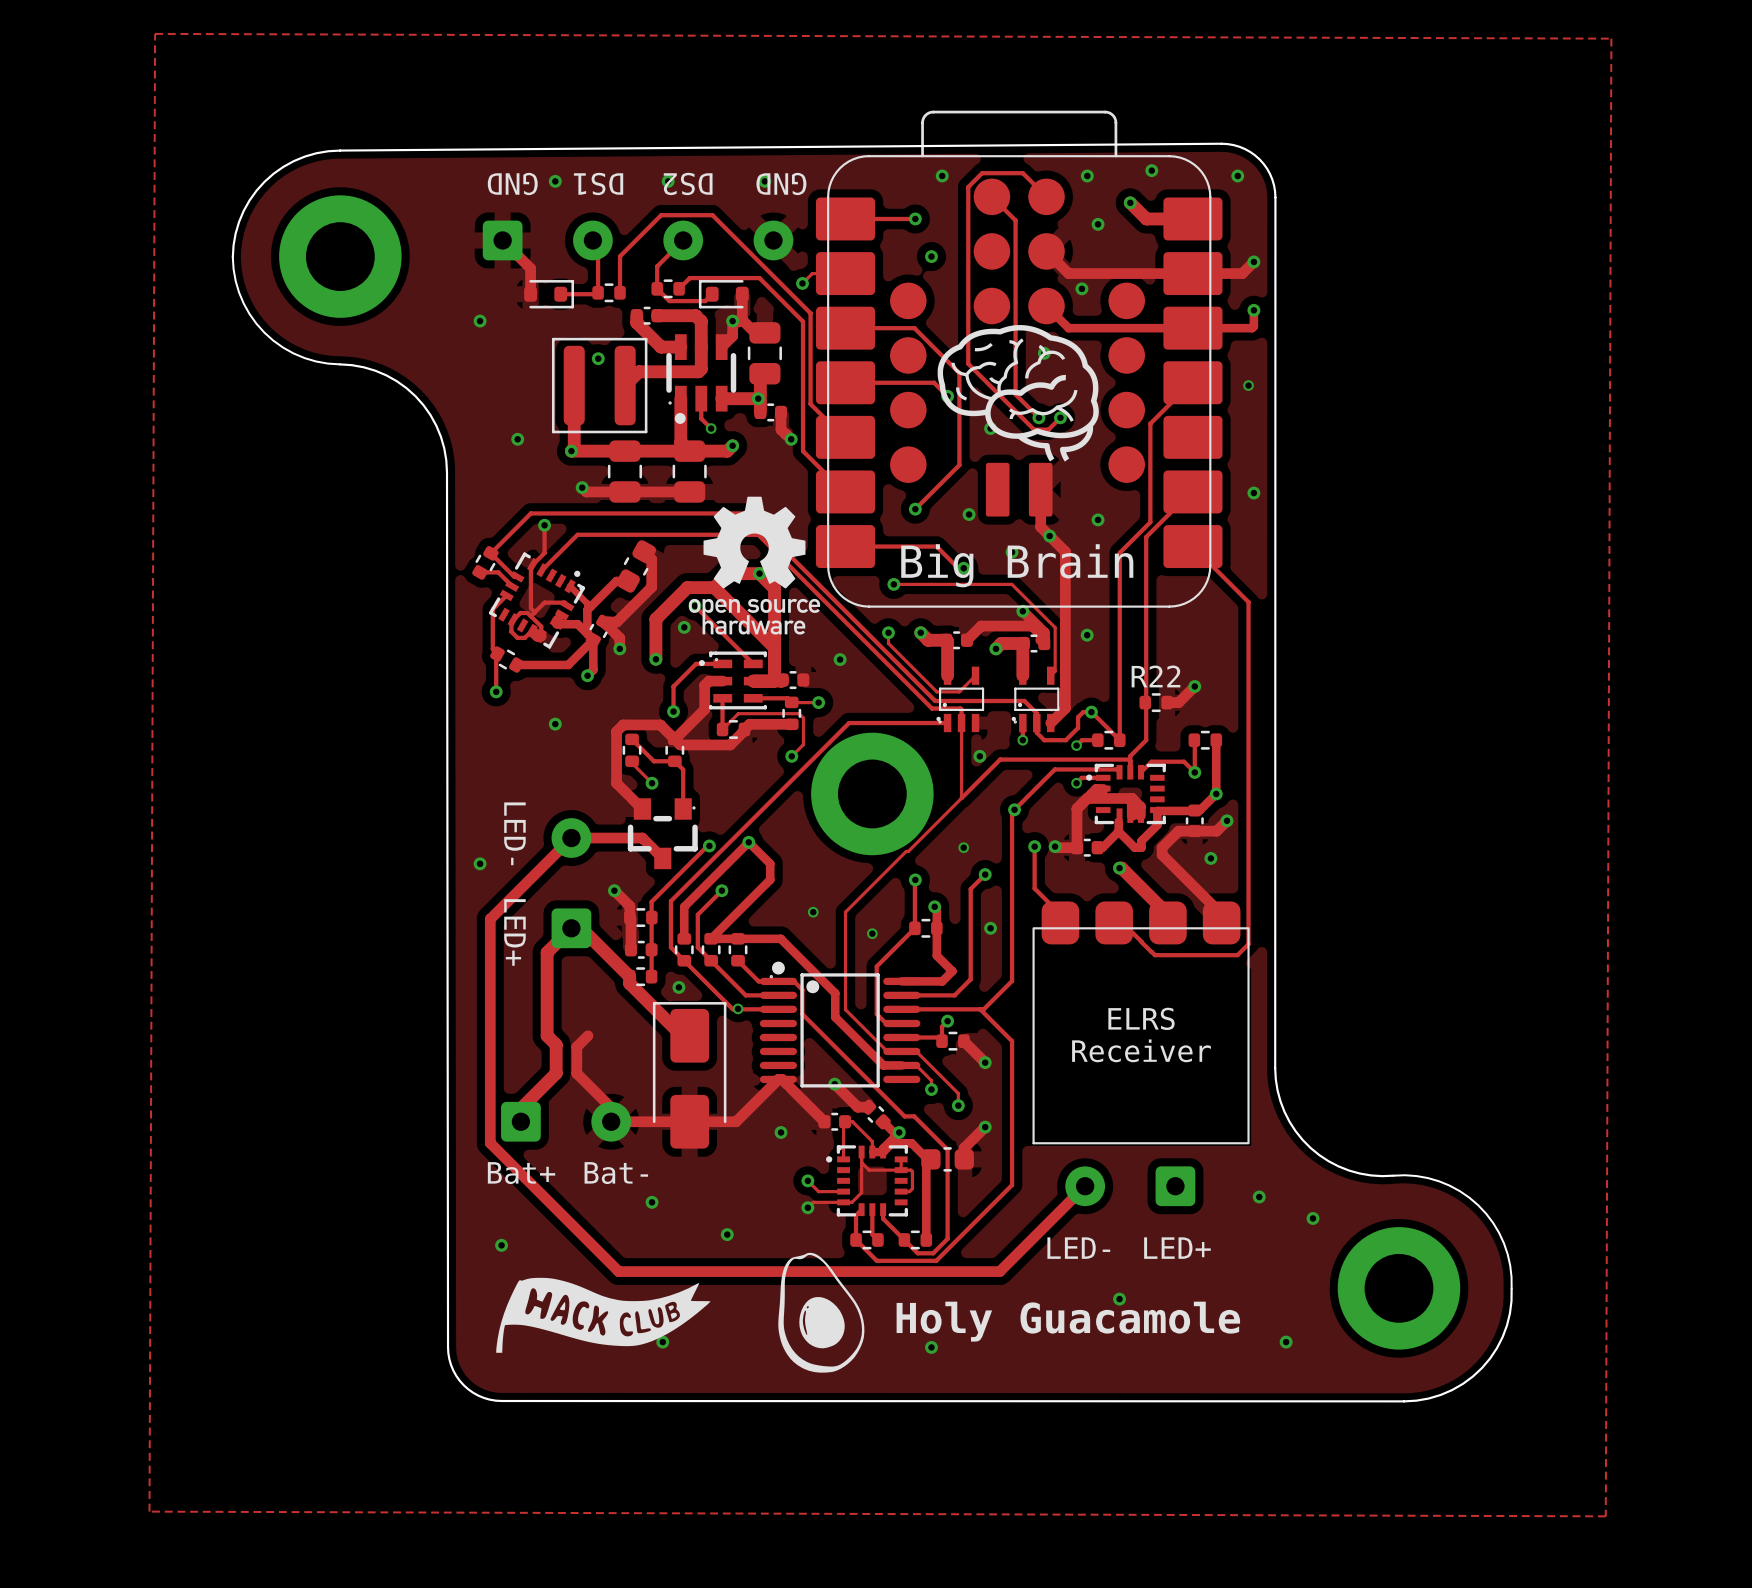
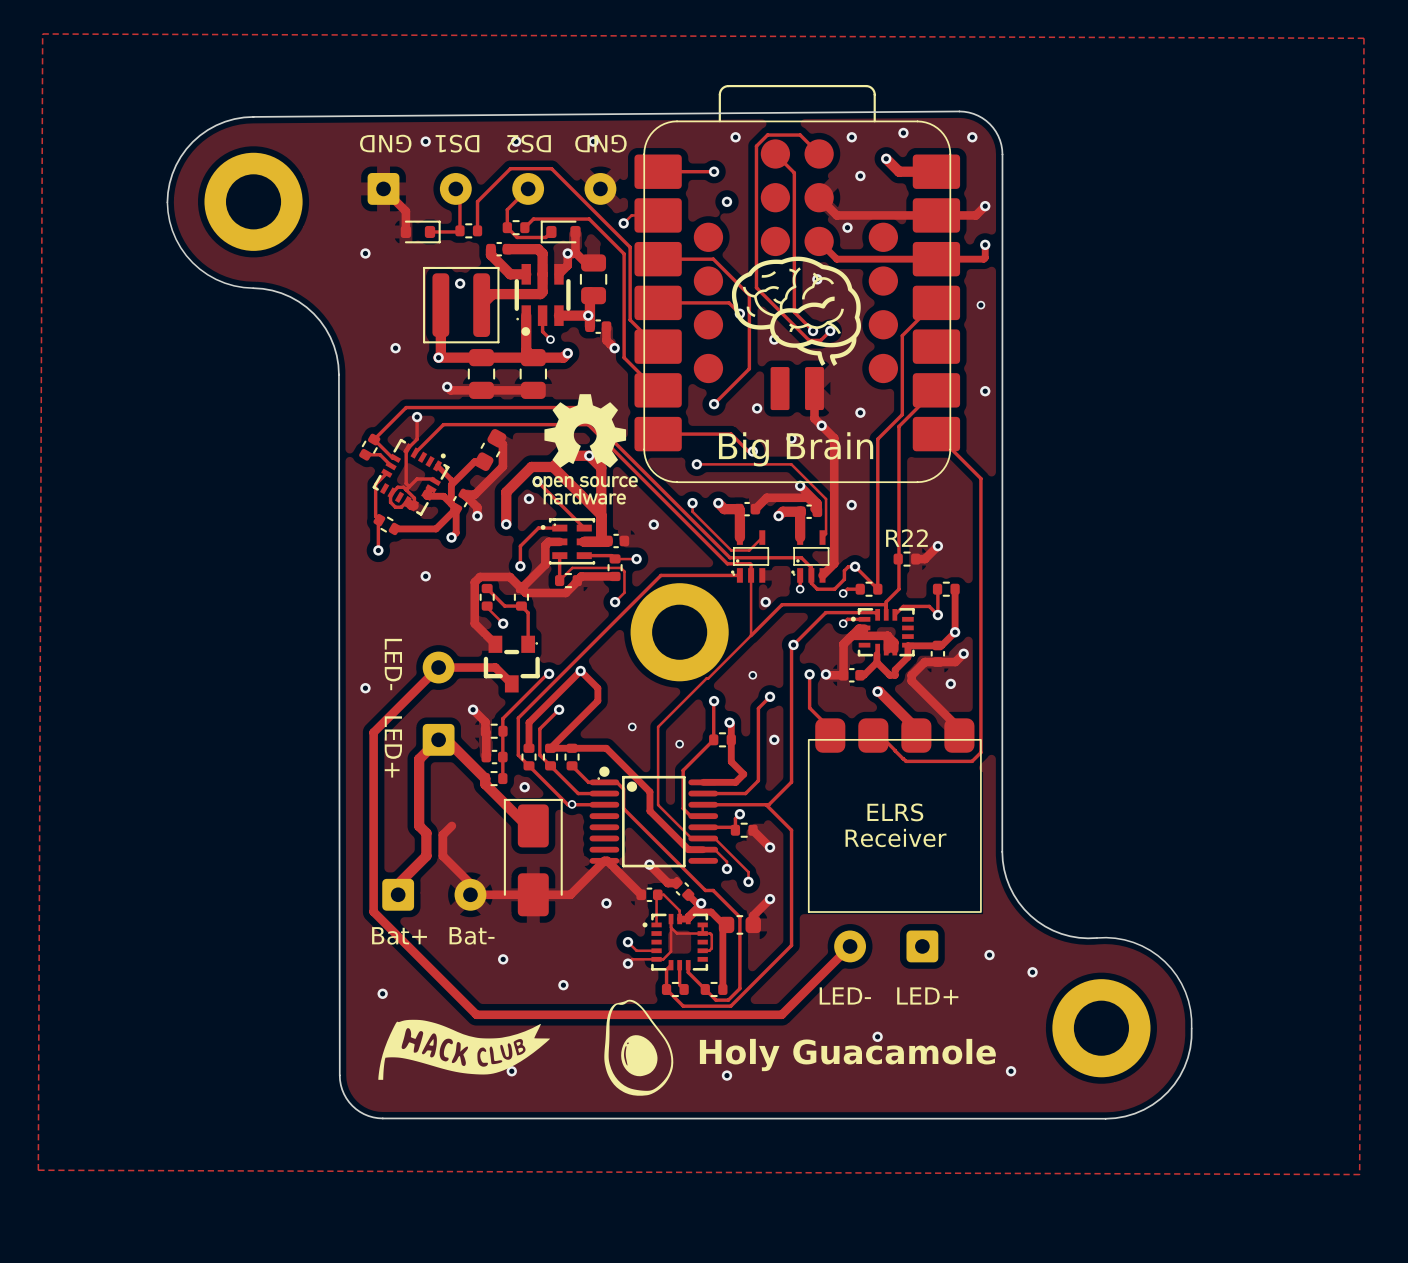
zone outline: (155, 33) (1611, 38) (1605, 1516) (149, 1511) (155, 33) -> (42, 33) (38, 1170) (1359, 1174) (1363, 38) (42, 33)

